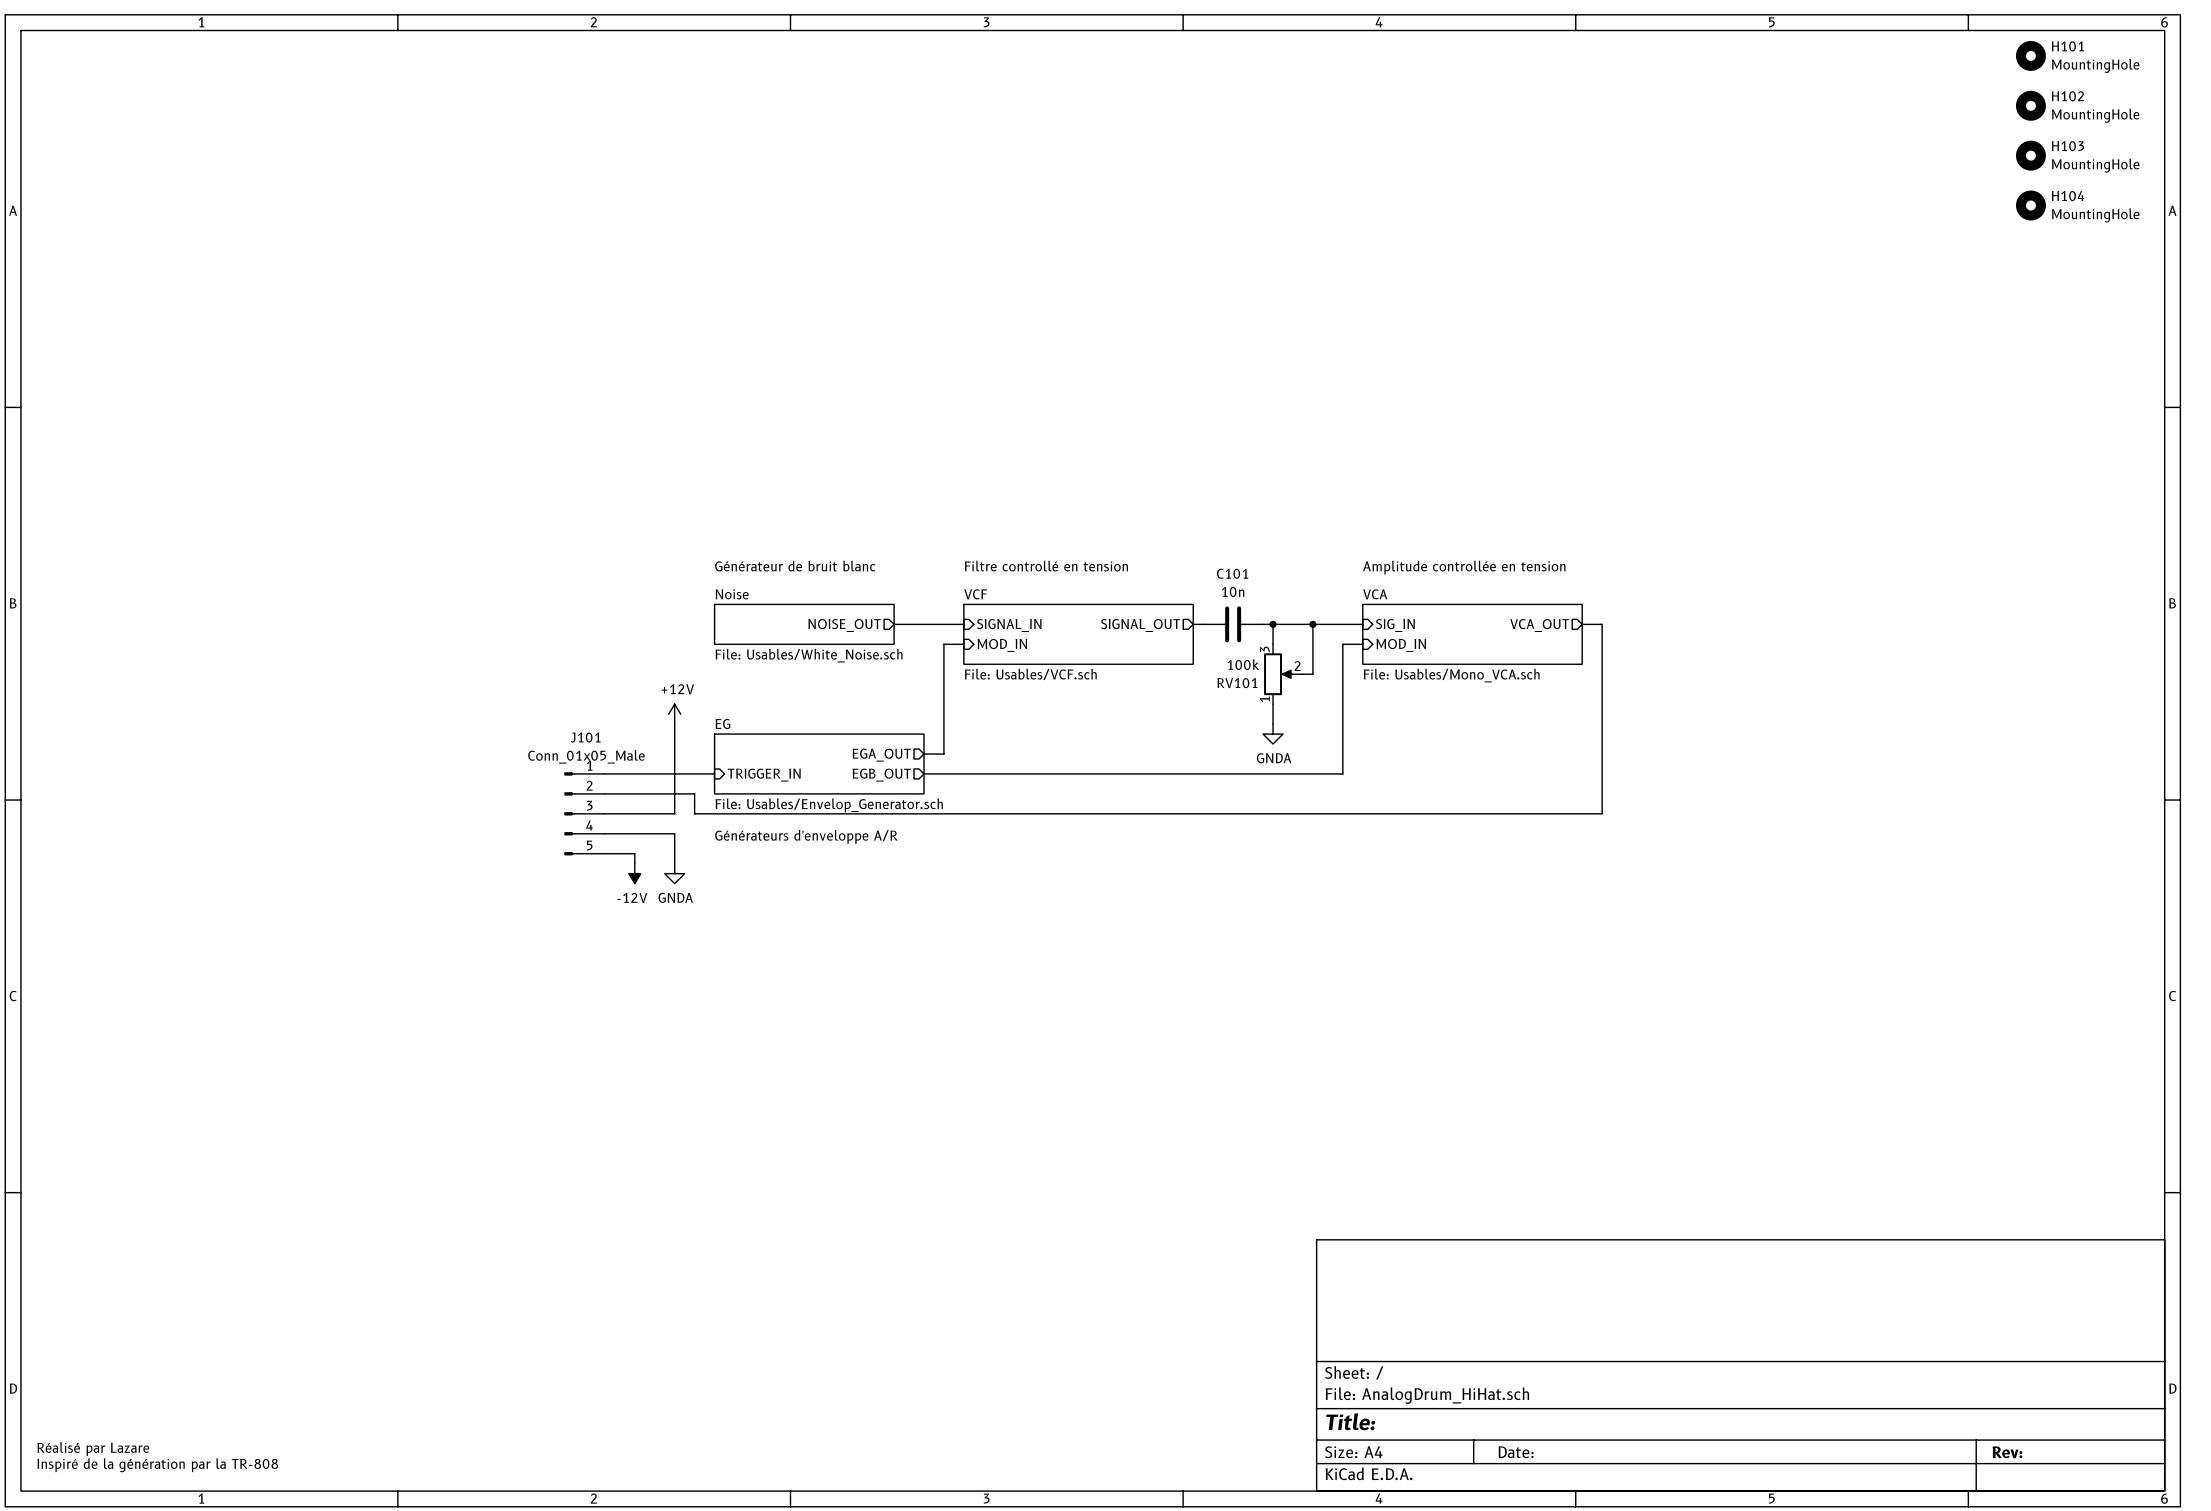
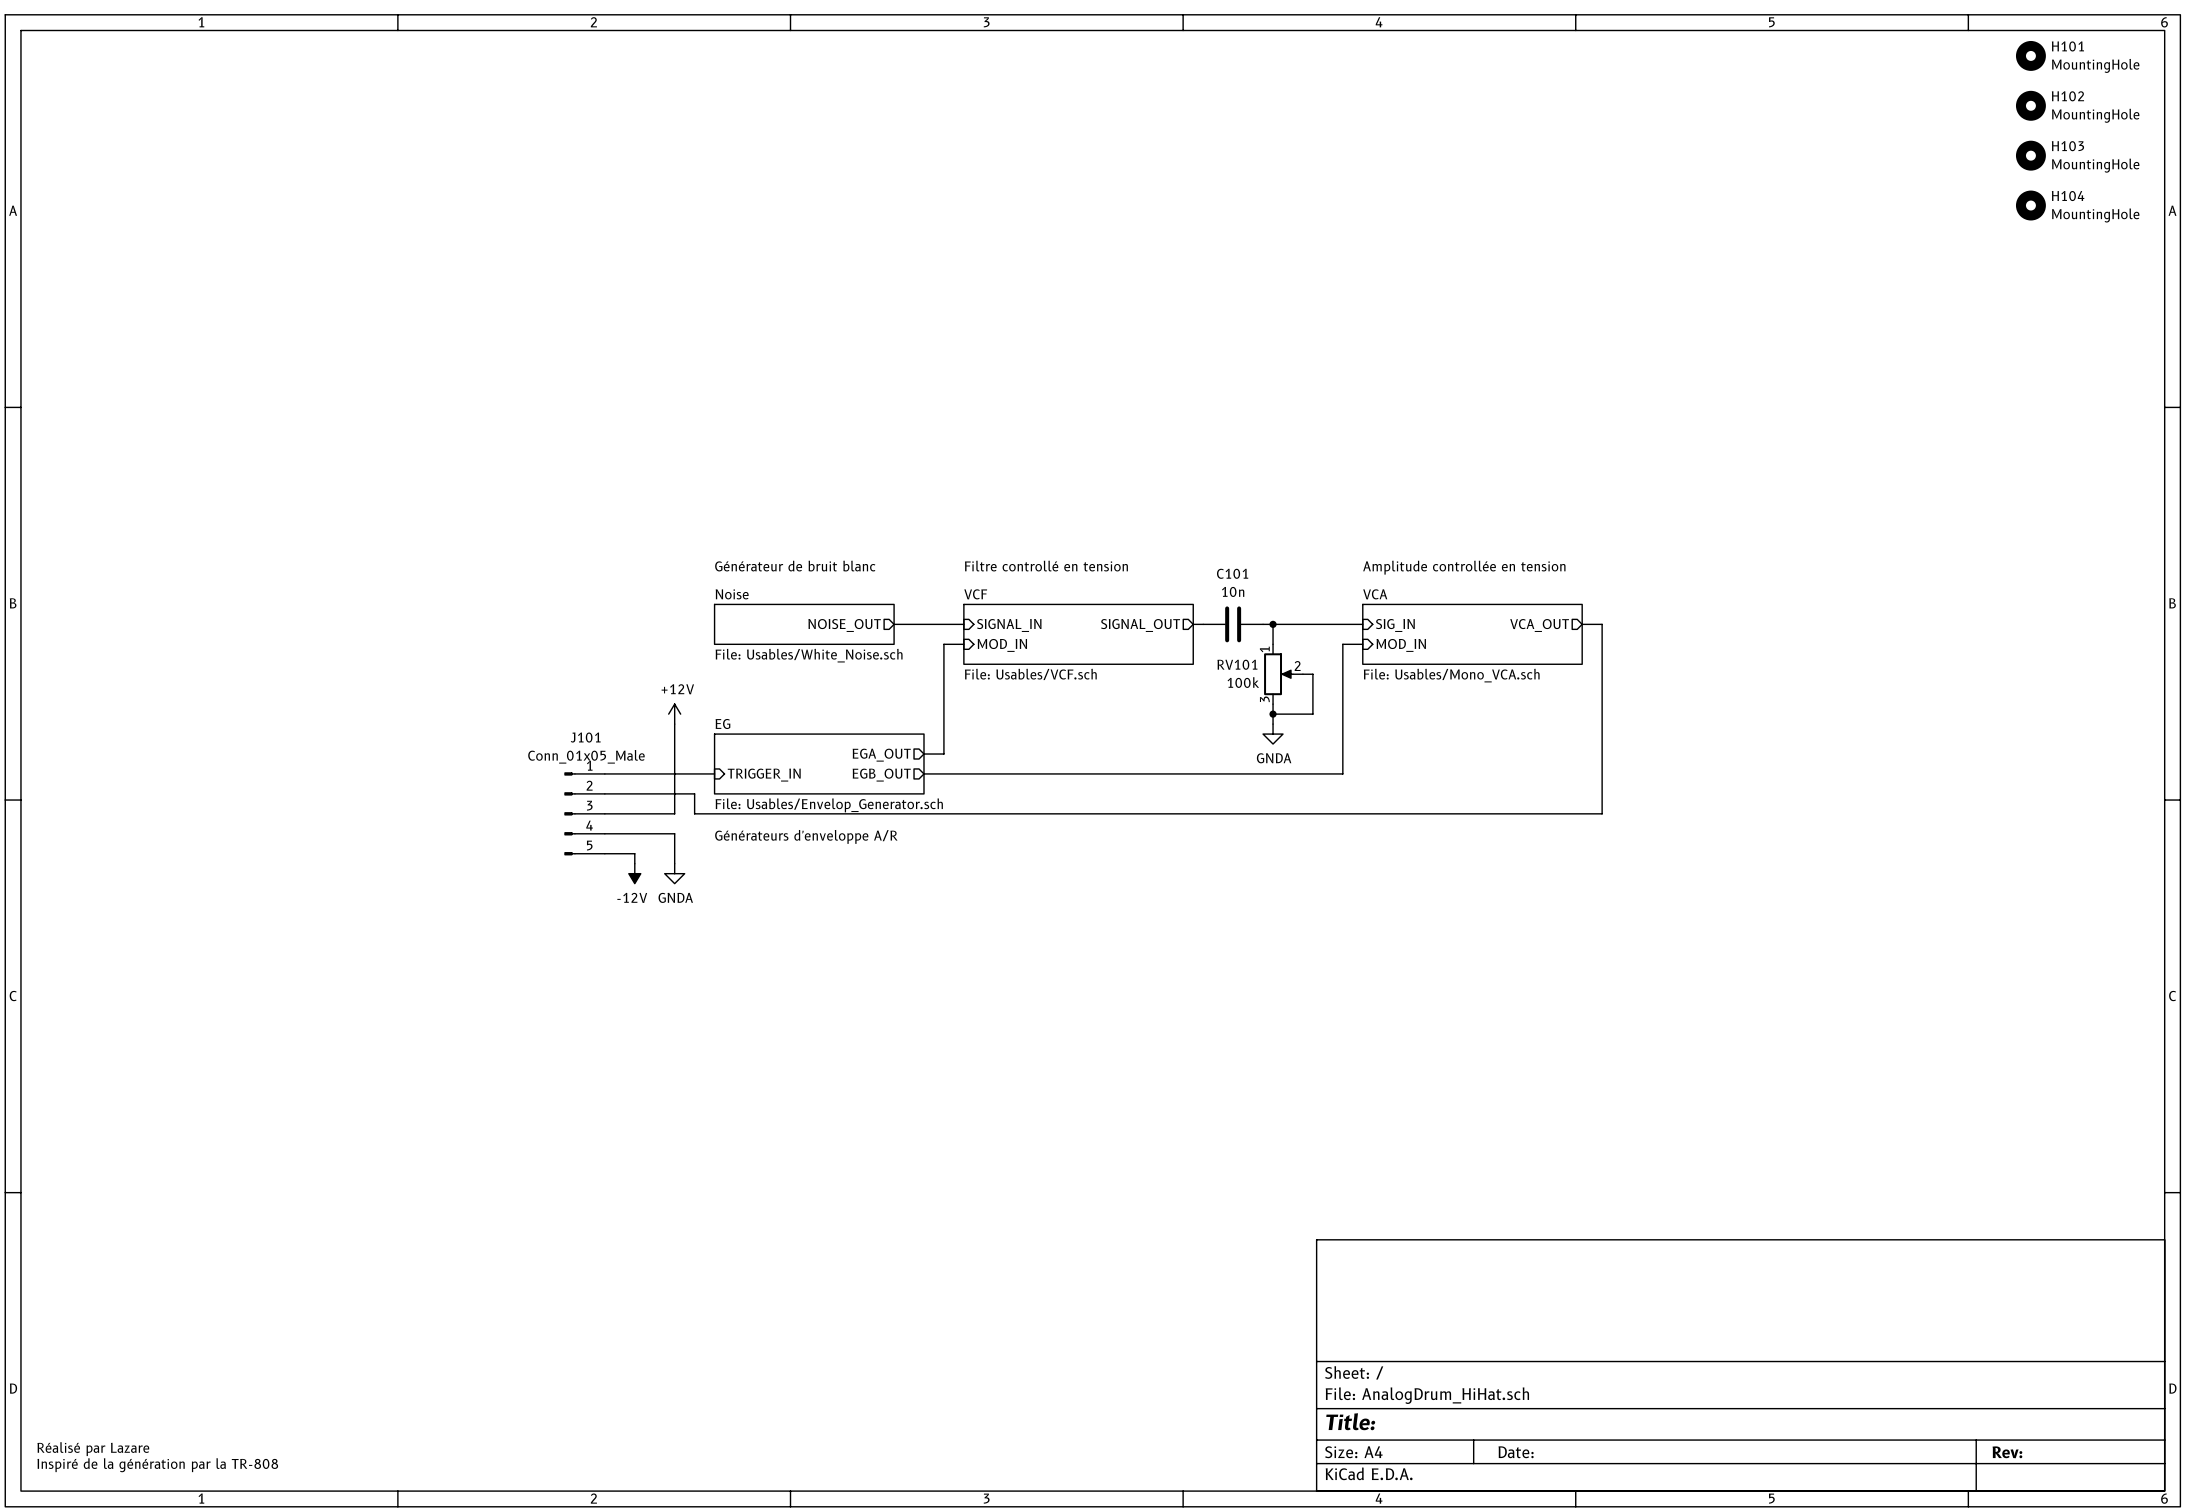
wire: (1312, 624) (1312, 674) -> (1273, 714) (1312, 714) (1312, 674)
junction: (1312, 624) -> none
RV101 flip: as is (1278, 674) -> up-down (1278, 674)
junction: none -> (1273, 714)

